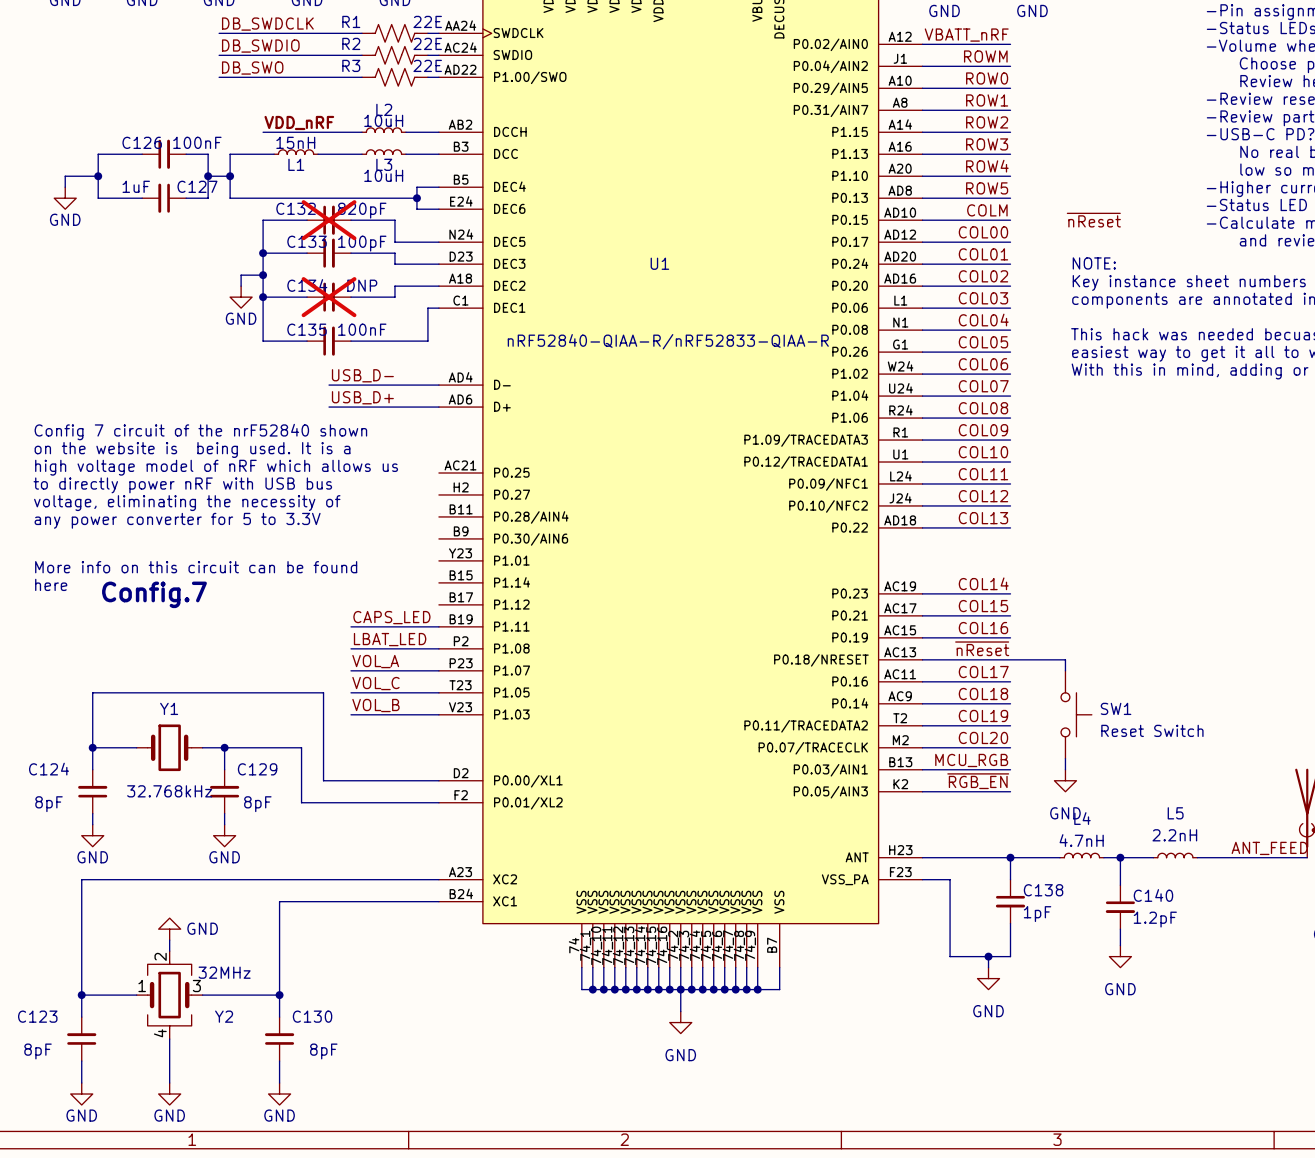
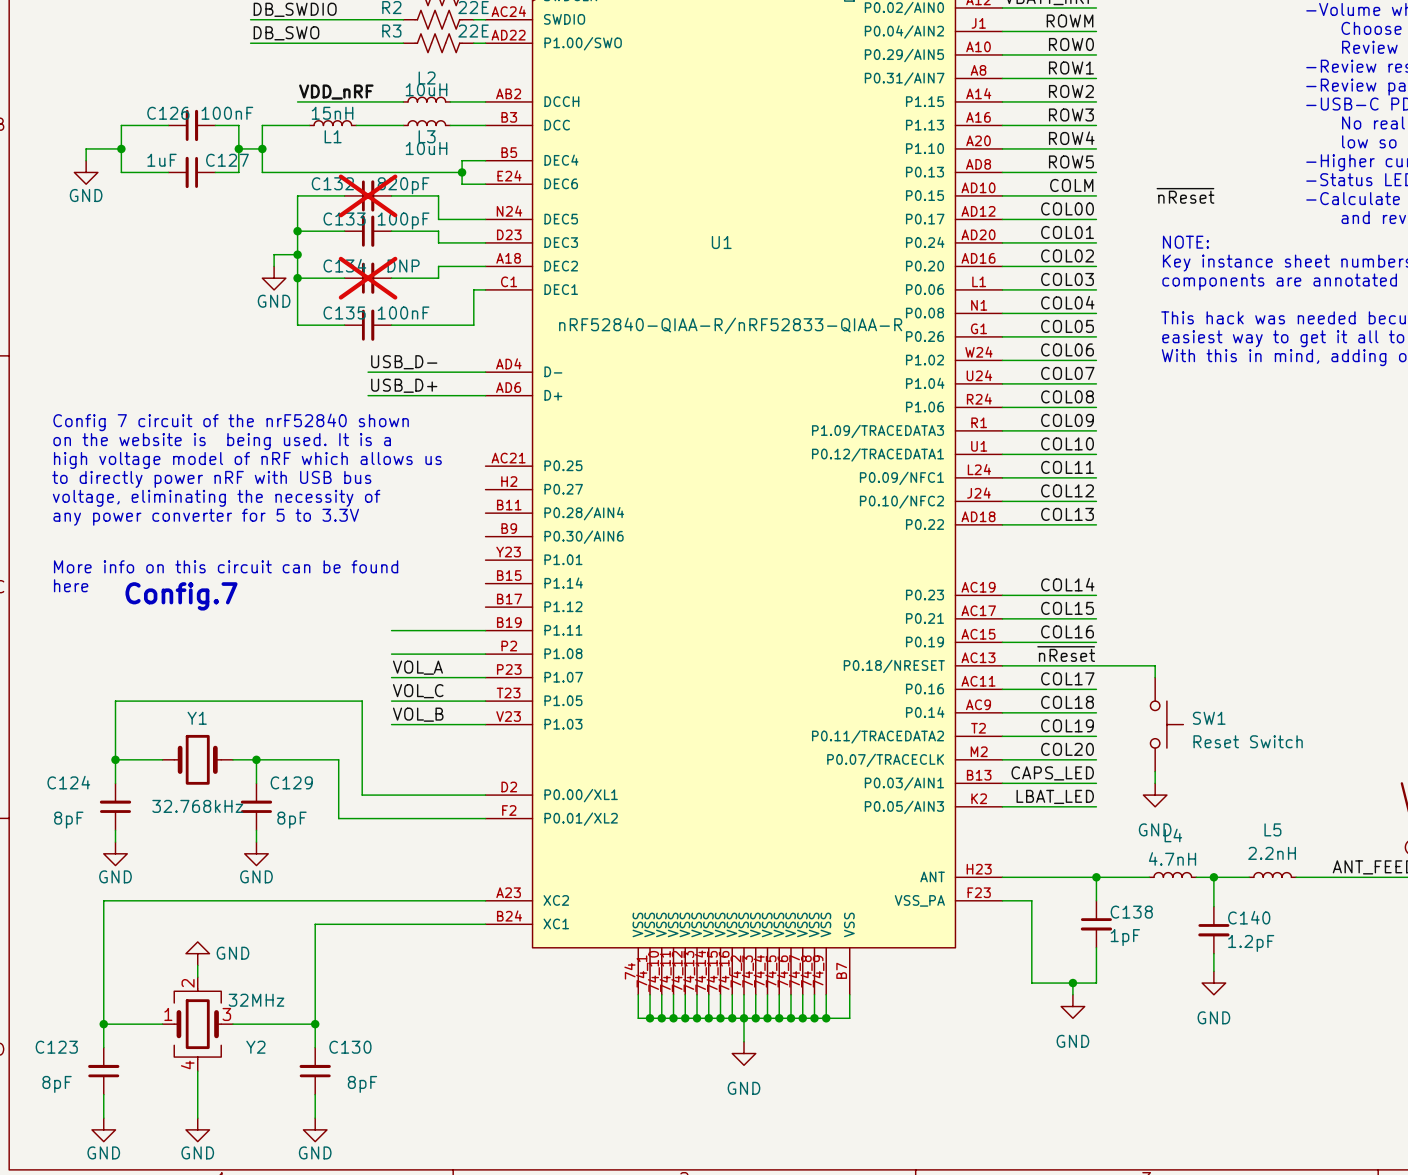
label: CAPS_LED (391, 617) -> none
label: LBAT_LED (390, 639) -> none
label: MCU_RGB (971, 760) -> CAPS_LED (1052, 773)
label: ~{RGB_EN} (978, 781) -> LBAT_LED (1055, 796)

